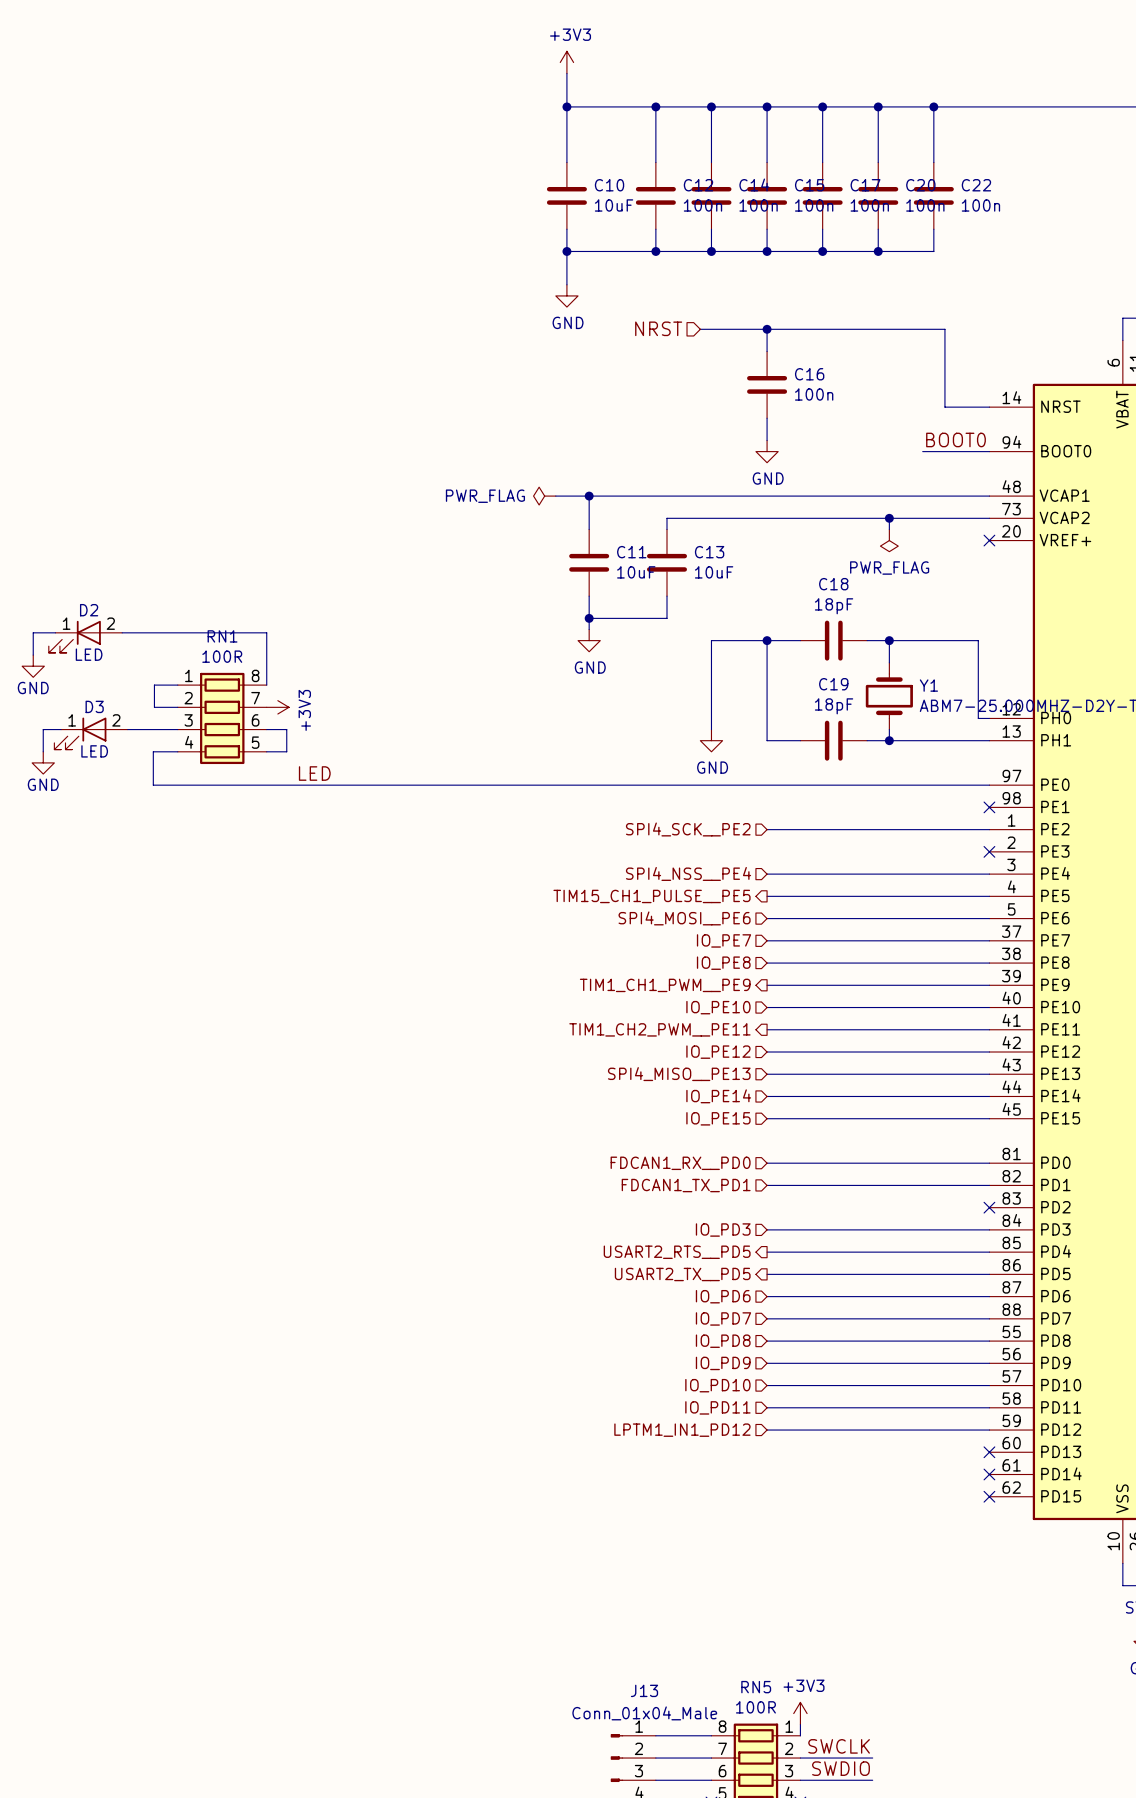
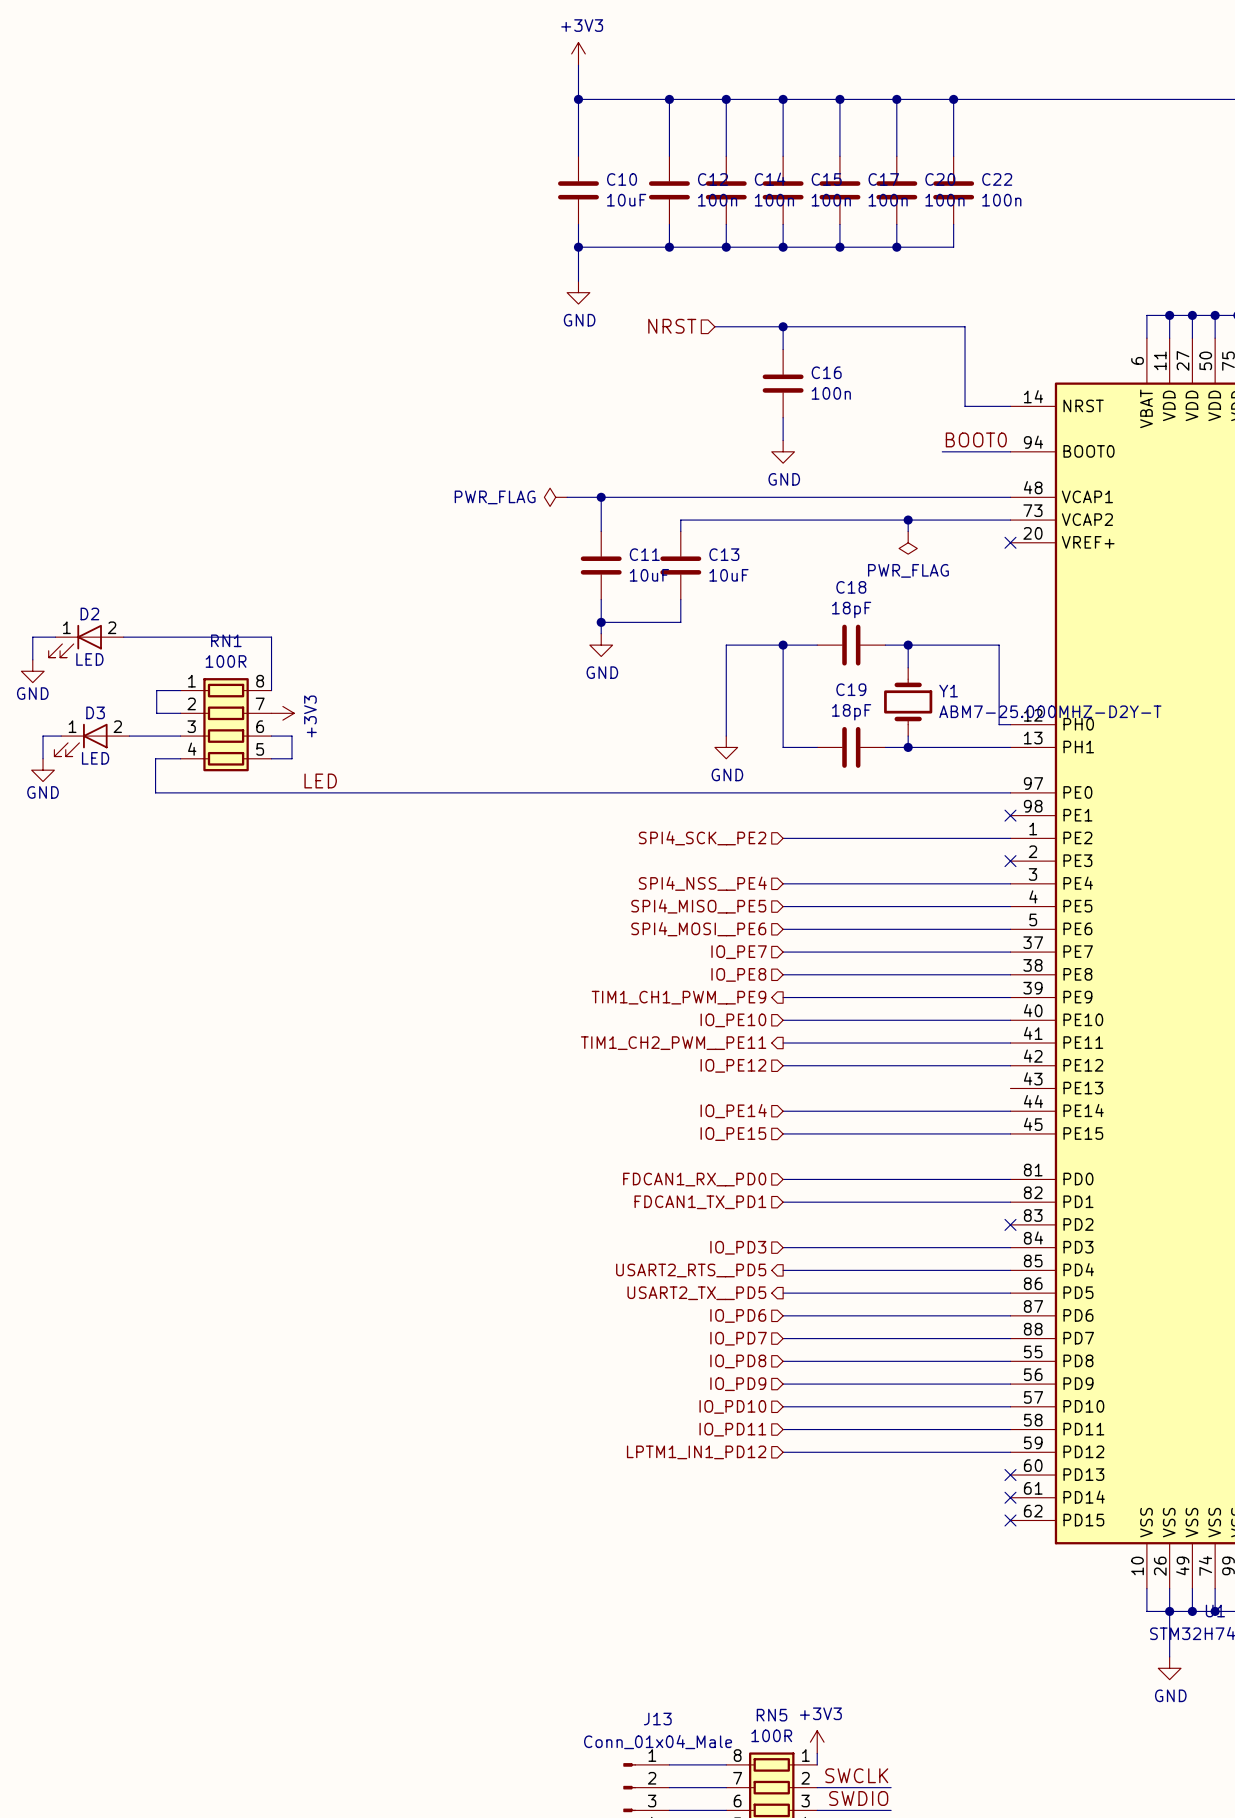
hierarchical label shape: output (652, 896) -> input (698, 906)
hierarchical label: TIM15_CH1_PULSE__PE5 (652, 896) -> SPI4_MISO__PE5 (698, 906)
hierarchical label: SPI4_MISO__PE13 (679, 1074) -> none
wire: (767, 1074) (989, 1074) -> none

